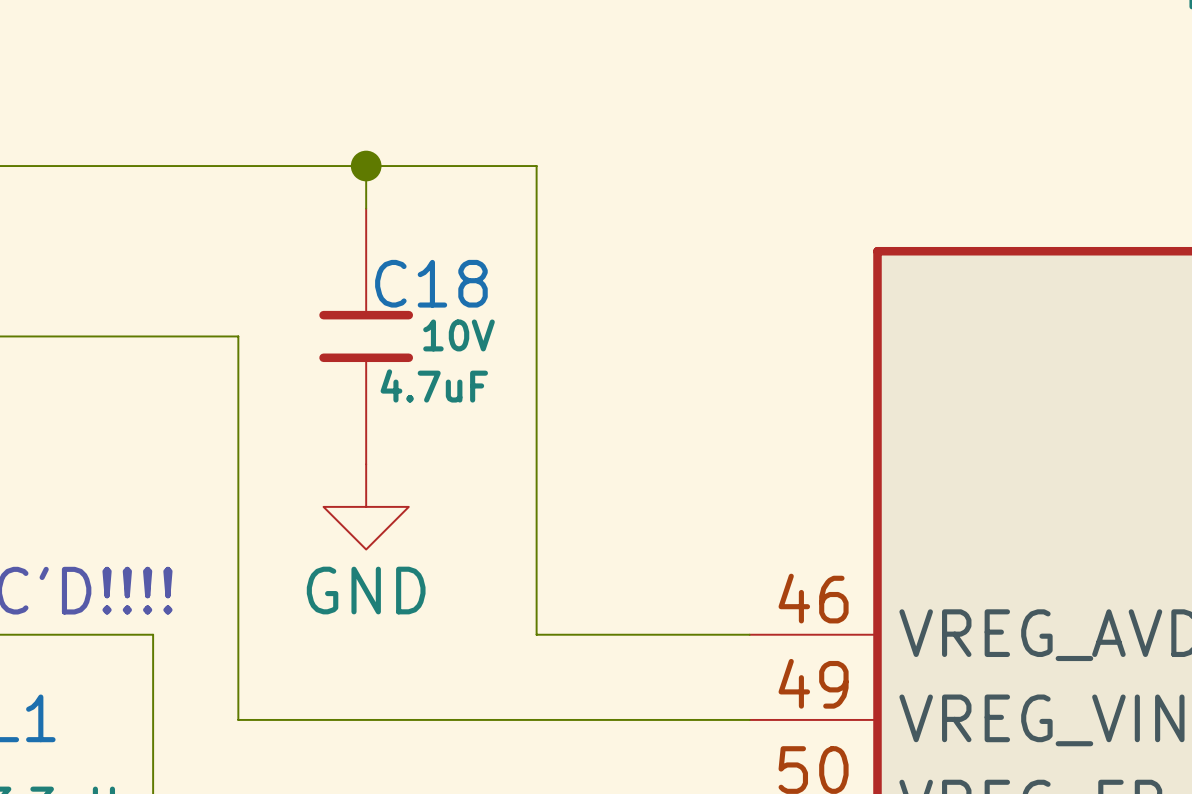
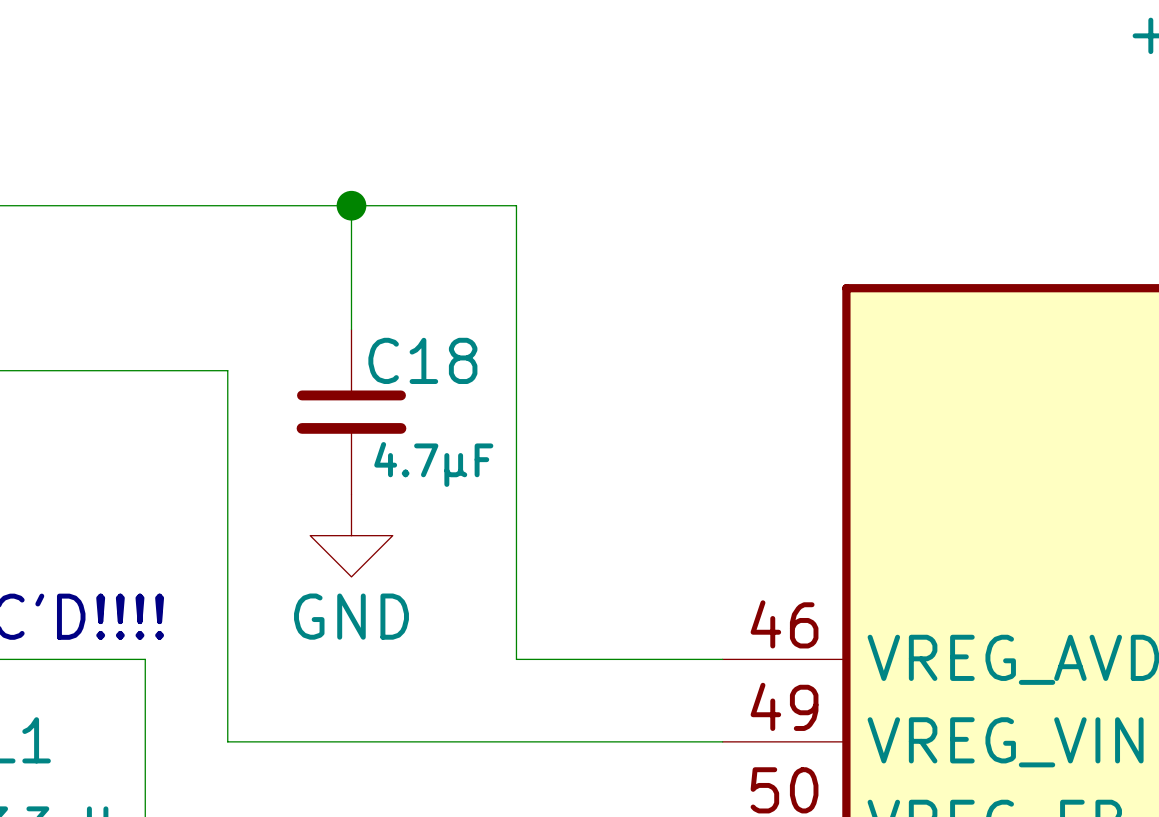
C18 symbol: [319, 208, 414, 465] -> [296, 329, 407, 495]
C18 text: 10V (459, 335) -> none
C18 value: 4.7uF (434, 385) -> 4.7µF (433, 464)

